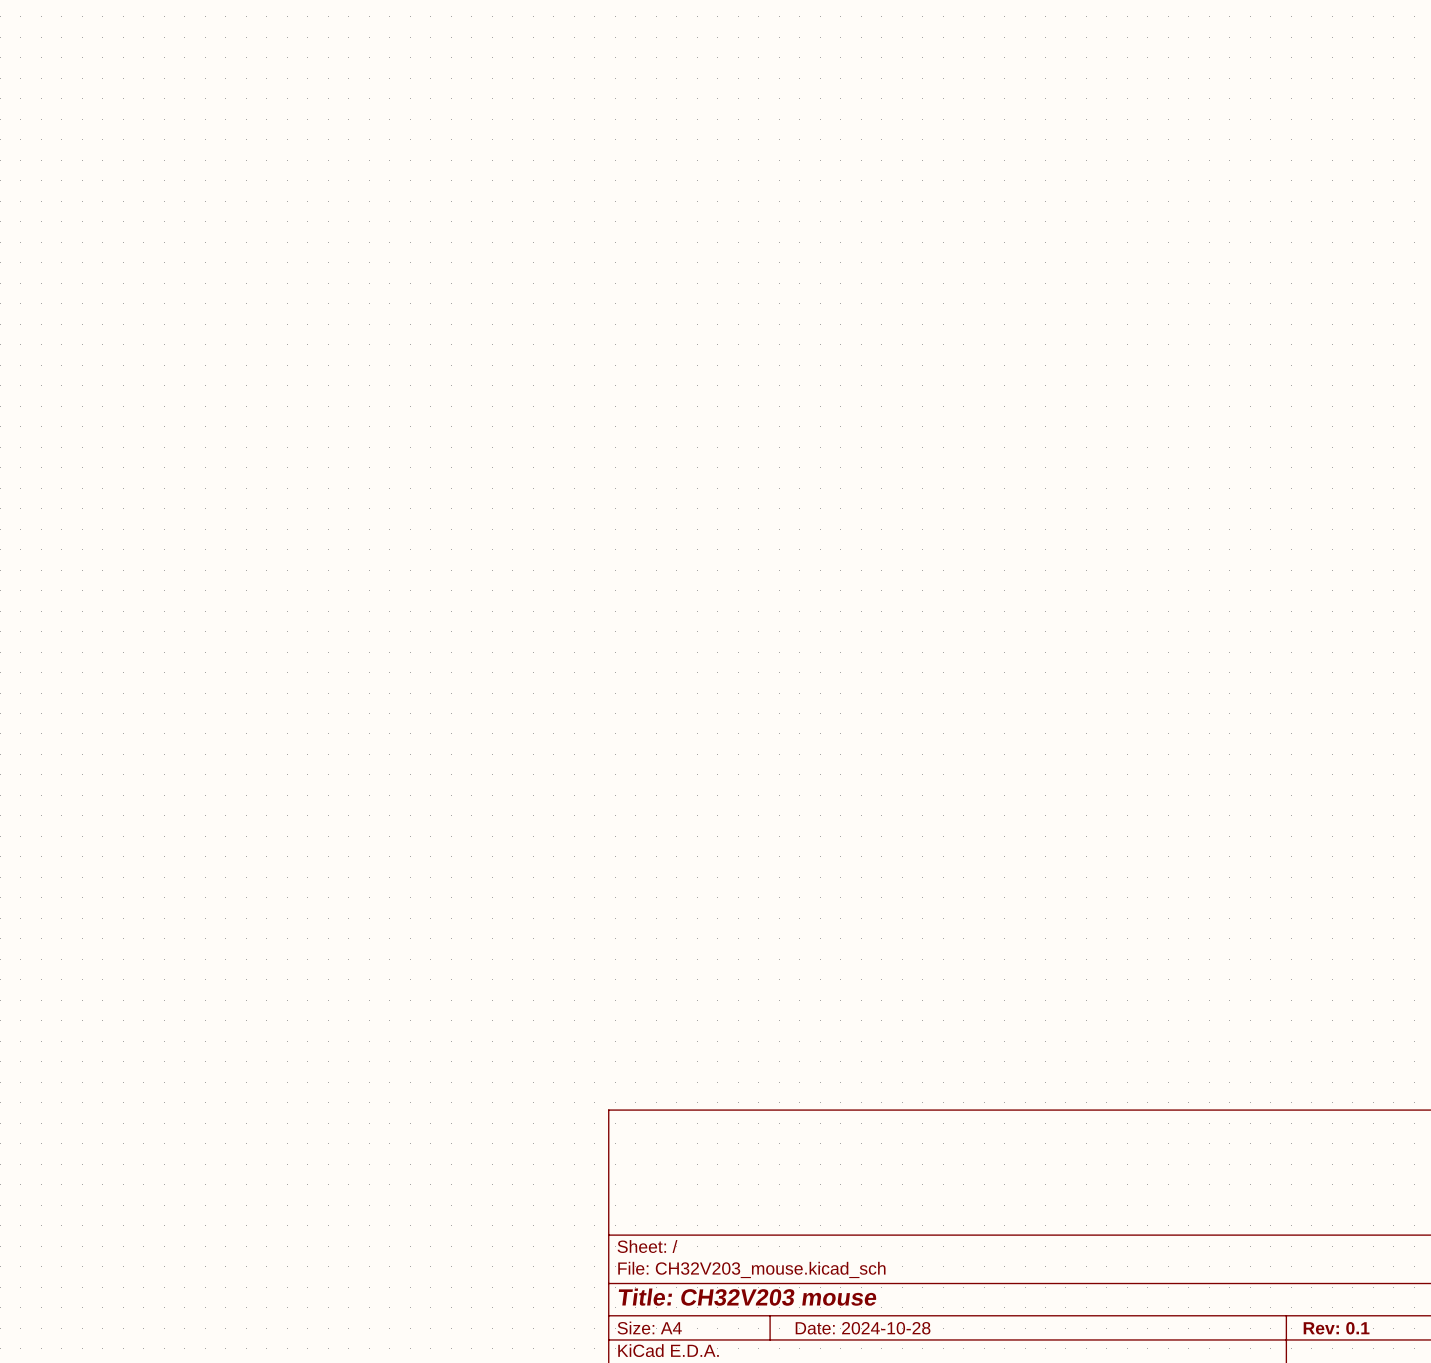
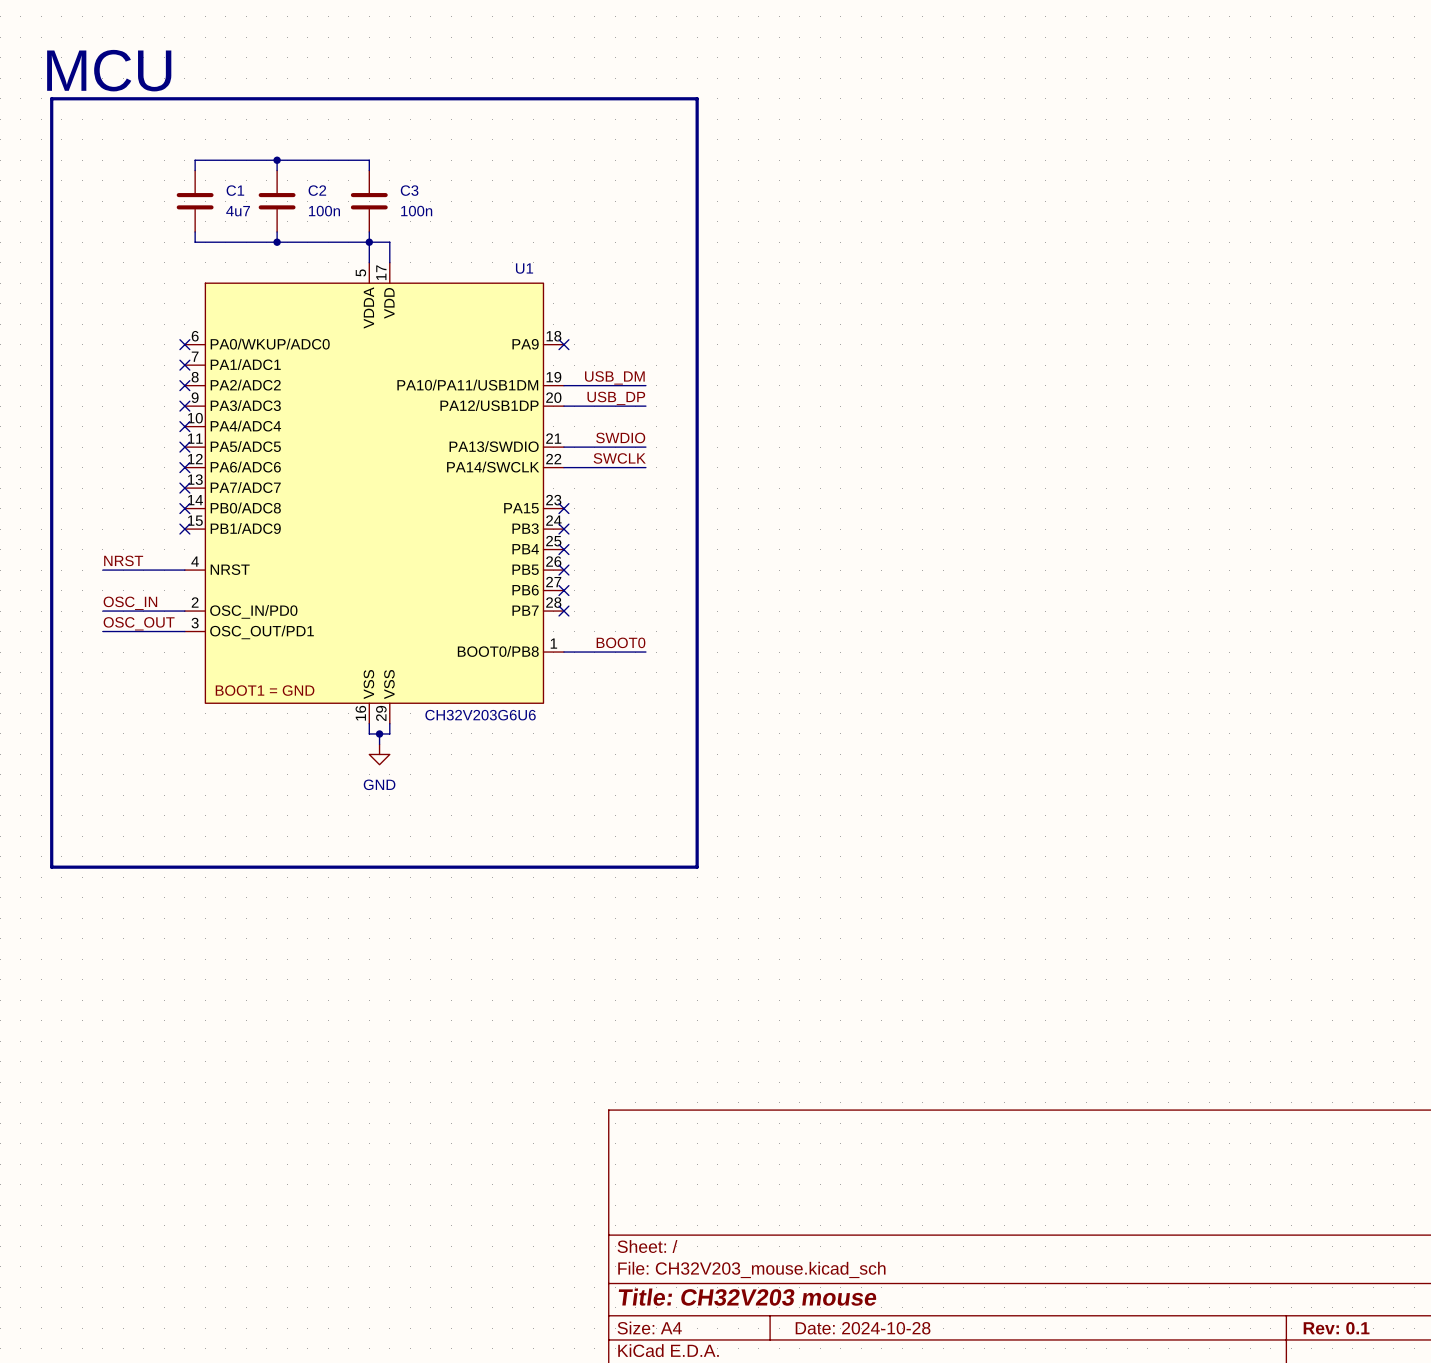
text: none -> MCU (109, 70)
line: none -> (51, 98) (697, 98) (697, 867) (51, 867) (51, 98)
wire: none -> (277, 160) (277, 170)
junction: none -> (277, 160)
wire: none -> (195, 170) (195, 160) (369, 160) (369, 170)
C1: none -> 4u7 (195, 201)
C2: none -> 100n (277, 201)
C3: none -> 100n (369, 201)
wire: none -> (195, 231) (195, 242) (389, 242) (389, 262)
wire: none -> (277, 231) (277, 242)
wire: none -> (369, 231) (369, 262)
junction: none -> (277, 242)
junction: none -> (369, 242)
no-connect mark: none -> (184, 344)
no-connect mark: none -> (563, 344)
no-connect mark: none -> (184, 365)
label: none -> USB_DM (614, 377)
no-connect mark: none -> (184, 385)
wire: none -> (563, 385) (645, 385)
label: none -> USB_DP (616, 398)
no-connect mark: none -> (184, 406)
wire: none -> (563, 406) (645, 406)
no-connect mark: none -> (184, 426)
label: none -> SWDIO (620, 437)
no-connect mark: none -> (184, 447)
wire: none -> (563, 447) (645, 447)
label: none -> SWCLK (619, 458)
no-connect mark: none -> (184, 467)
wire: none -> (563, 467) (645, 467)
no-connect mark: none -> (184, 488)
U1: none -> CH32V203G6U6 (374, 493)
no-connect mark: none -> (184, 508)
no-connect mark: none -> (563, 508)
no-connect mark: none -> (184, 529)
no-connect mark: none -> (563, 529)
no-connect mark: none -> (563, 549)
label: none -> NRST (123, 560)
wire: none -> (102, 570) (184, 570)
no-connect mark: none -> (563, 570)
no-connect mark: none -> (563, 590)
label: none -> OSC_IN (130, 603)
wire: none -> (102, 611) (184, 611)
no-connect mark: none -> (563, 611)
label: none -> OSC_OUT (139, 623)
wire: none -> (102, 631) (184, 631)
label: none -> BOOT0 (621, 642)
wire: none -> (563, 652) (645, 652)
wire: none -> (369, 723) (369, 733) (389, 733) (389, 723)
wire: none -> (379, 733) (379, 744)
junction: none -> (379, 733)
power symbol: none -> GND (379, 754)

